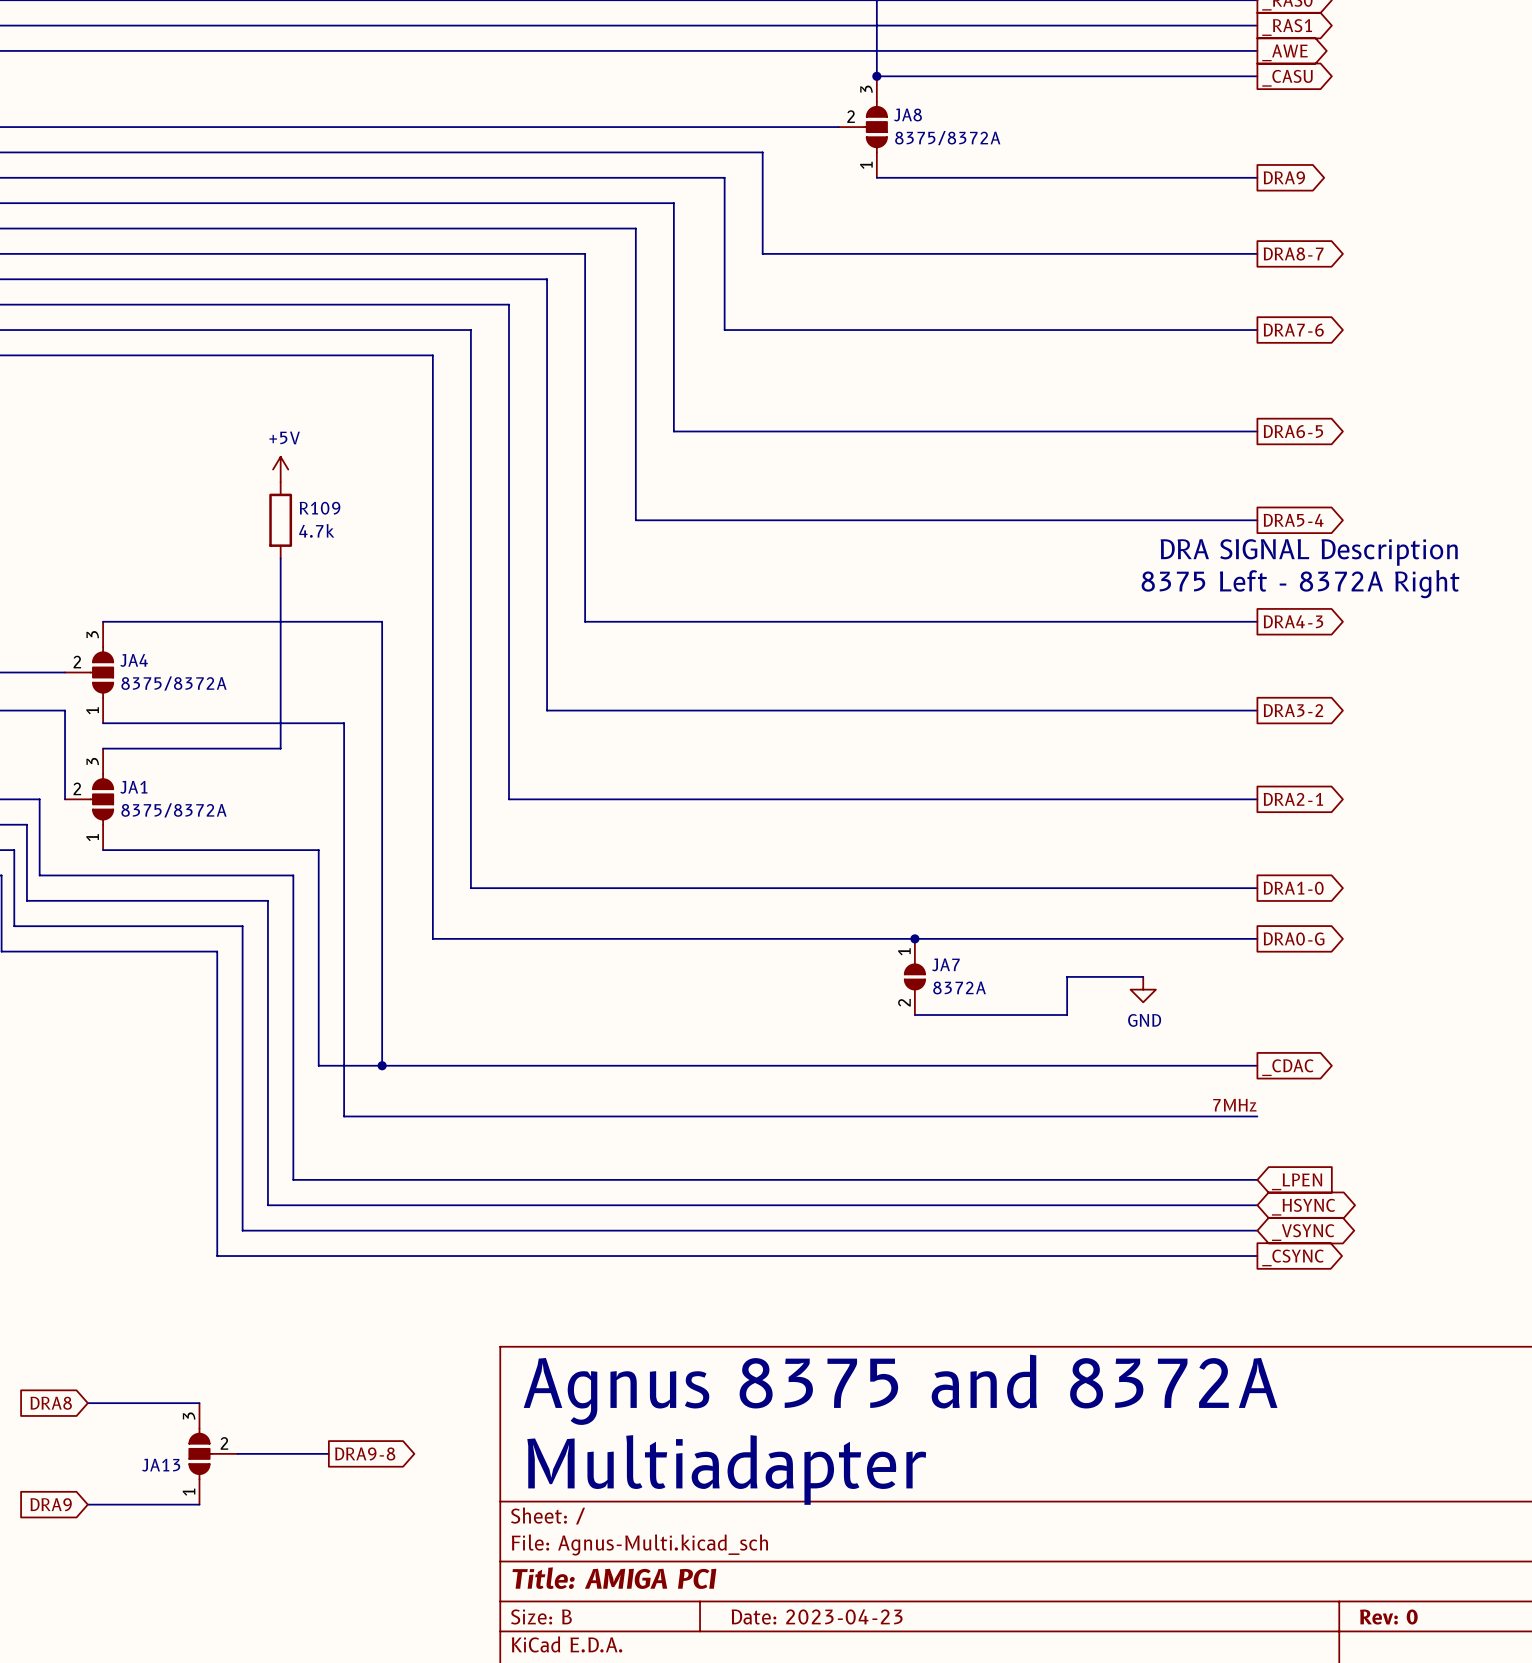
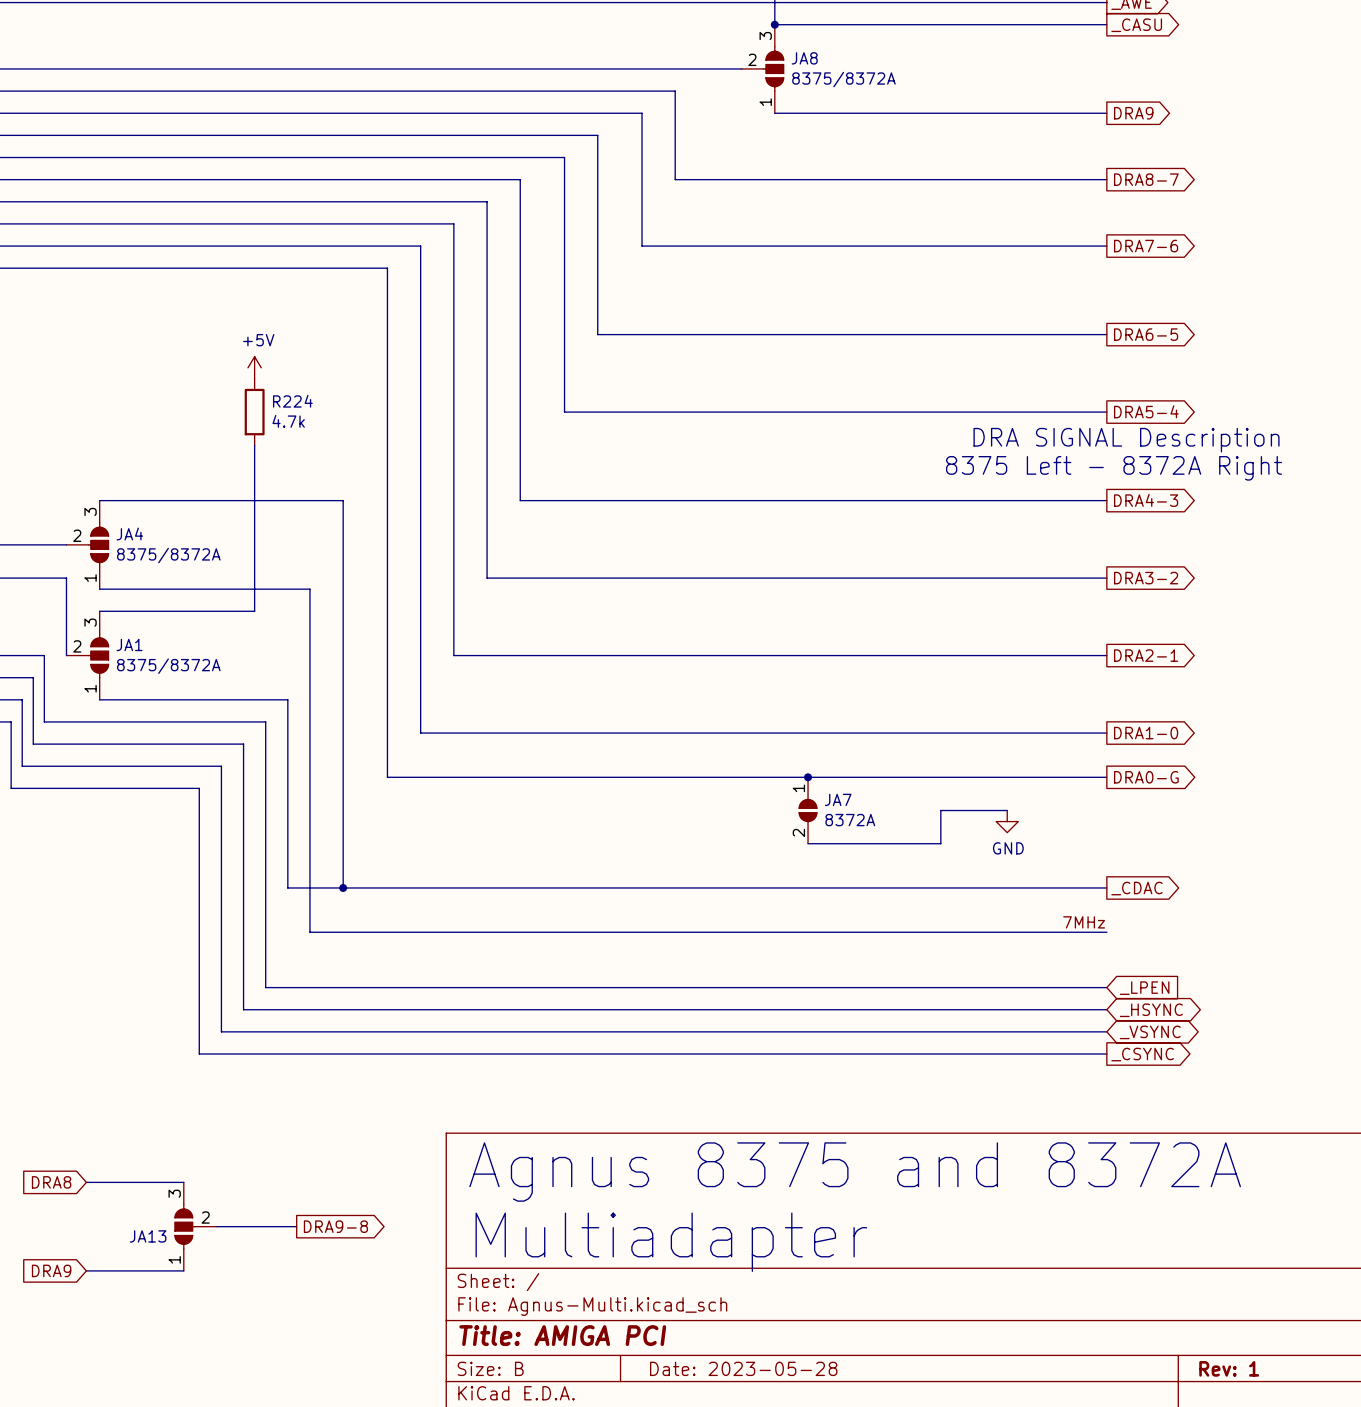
R109 name: R109 (320, 508) -> R224 (292, 401)
title block: Date: 2023-04-23 (817, 1616) -> Date: 2023-05-28 (743, 1368)
title block: Rev: 0 (1388, 1617) -> Rev: 1 (1229, 1368)

